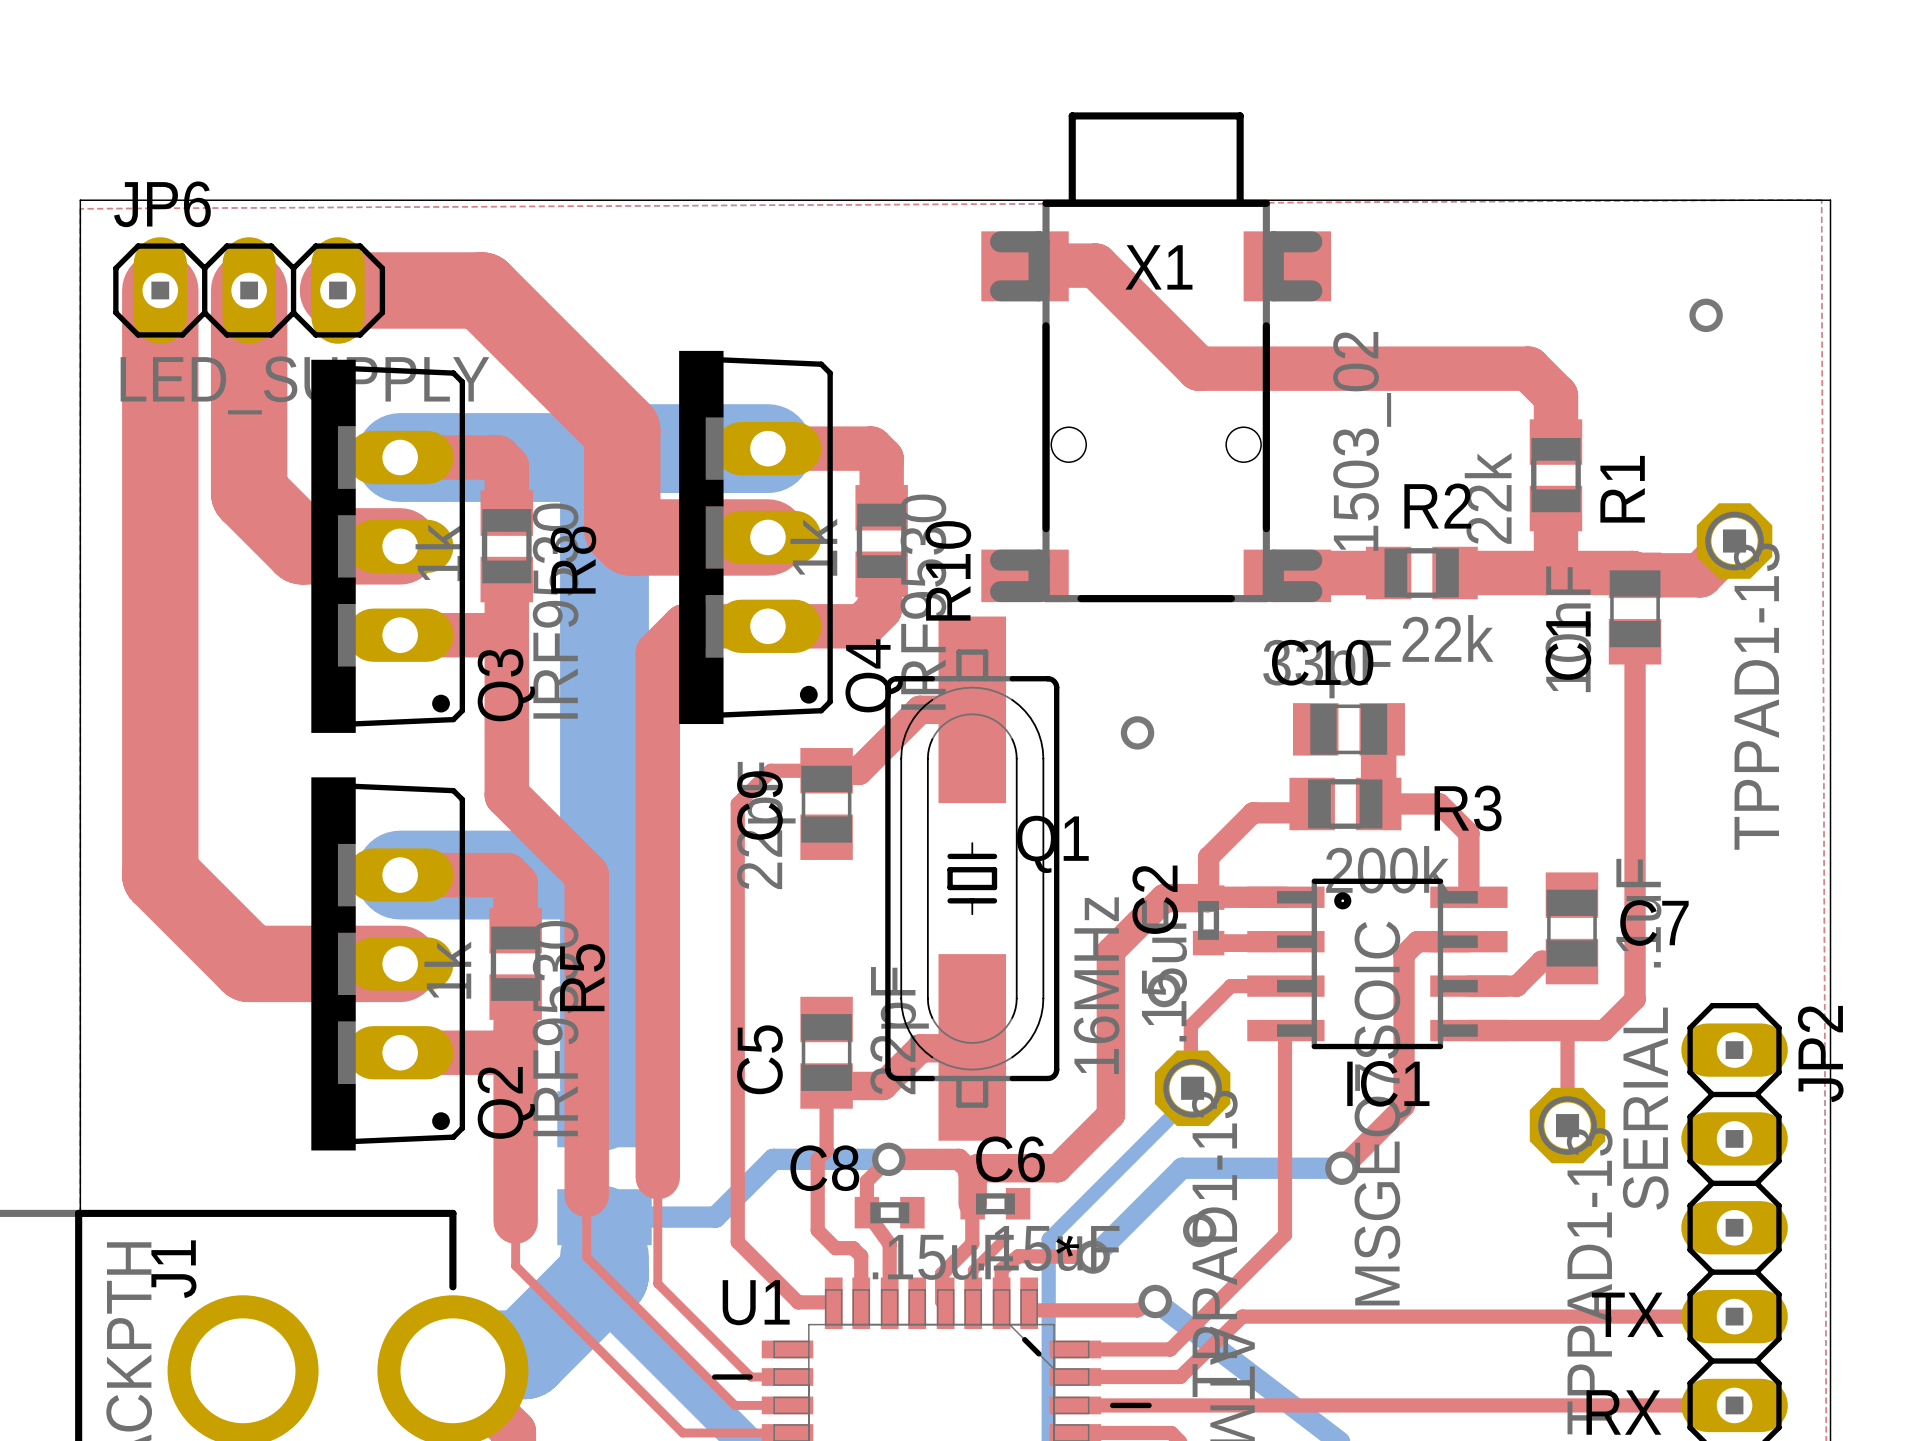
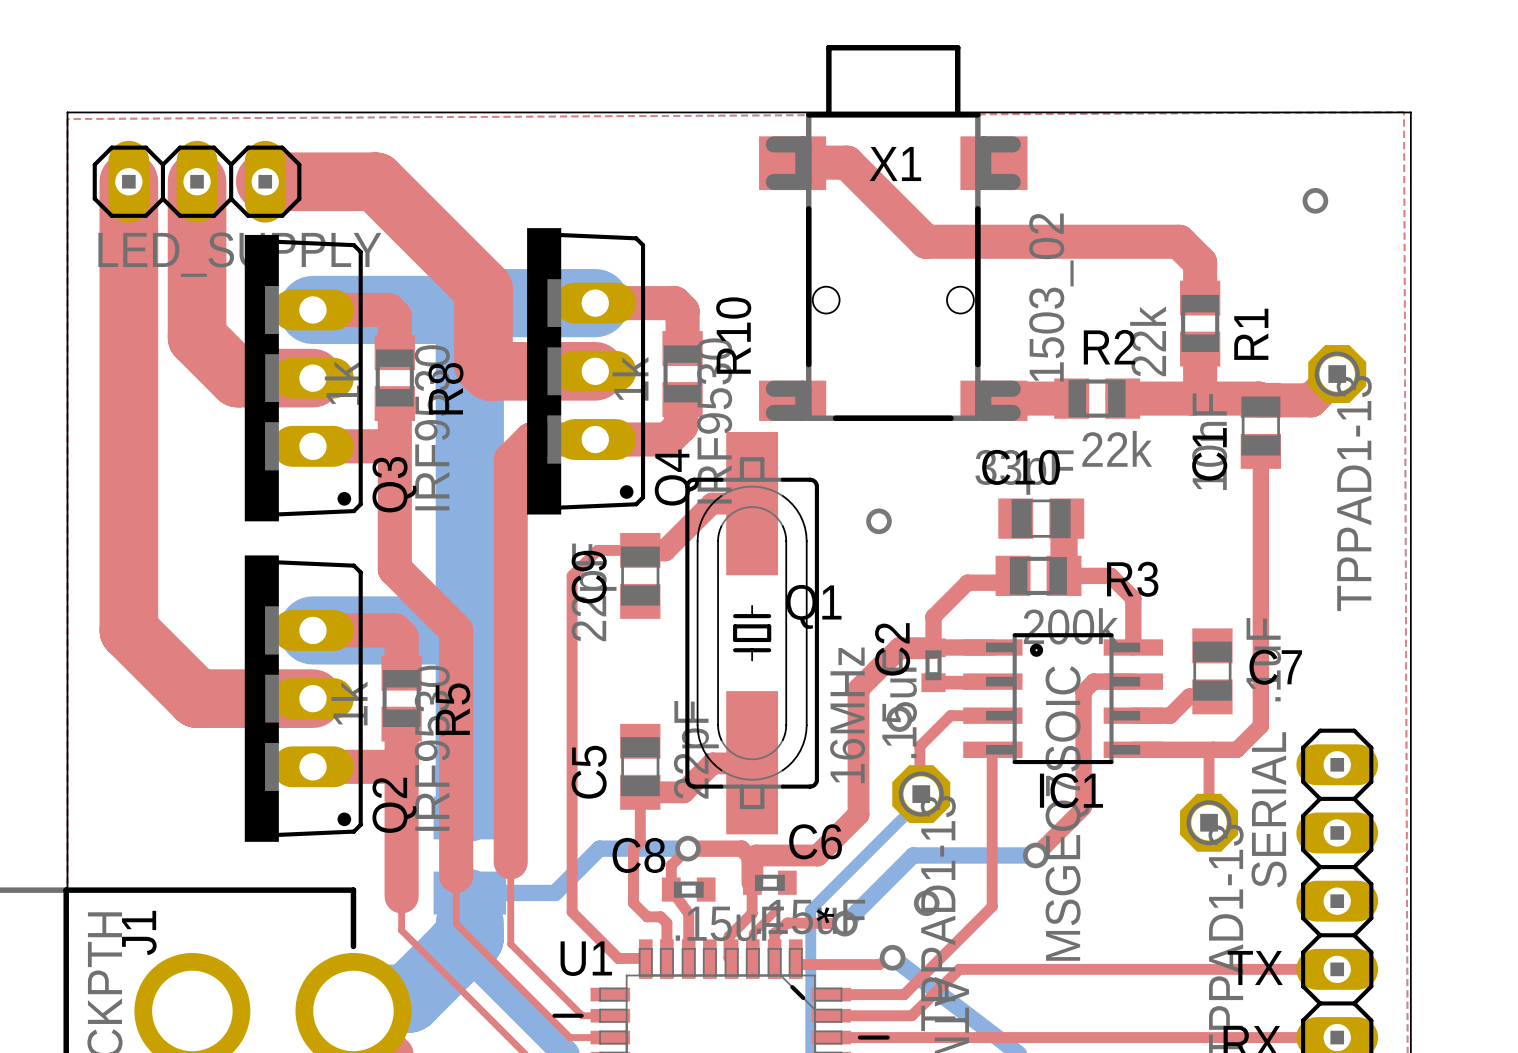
JP6 name: JP6 (162, 204) -> none
R10 name position: R10 (948, 570) -> R10 (733, 335)
JP2 name: JP2 (1820, 1054) -> none
C6 name position: C6 (1010, 1159) -> C6 (815, 841)

